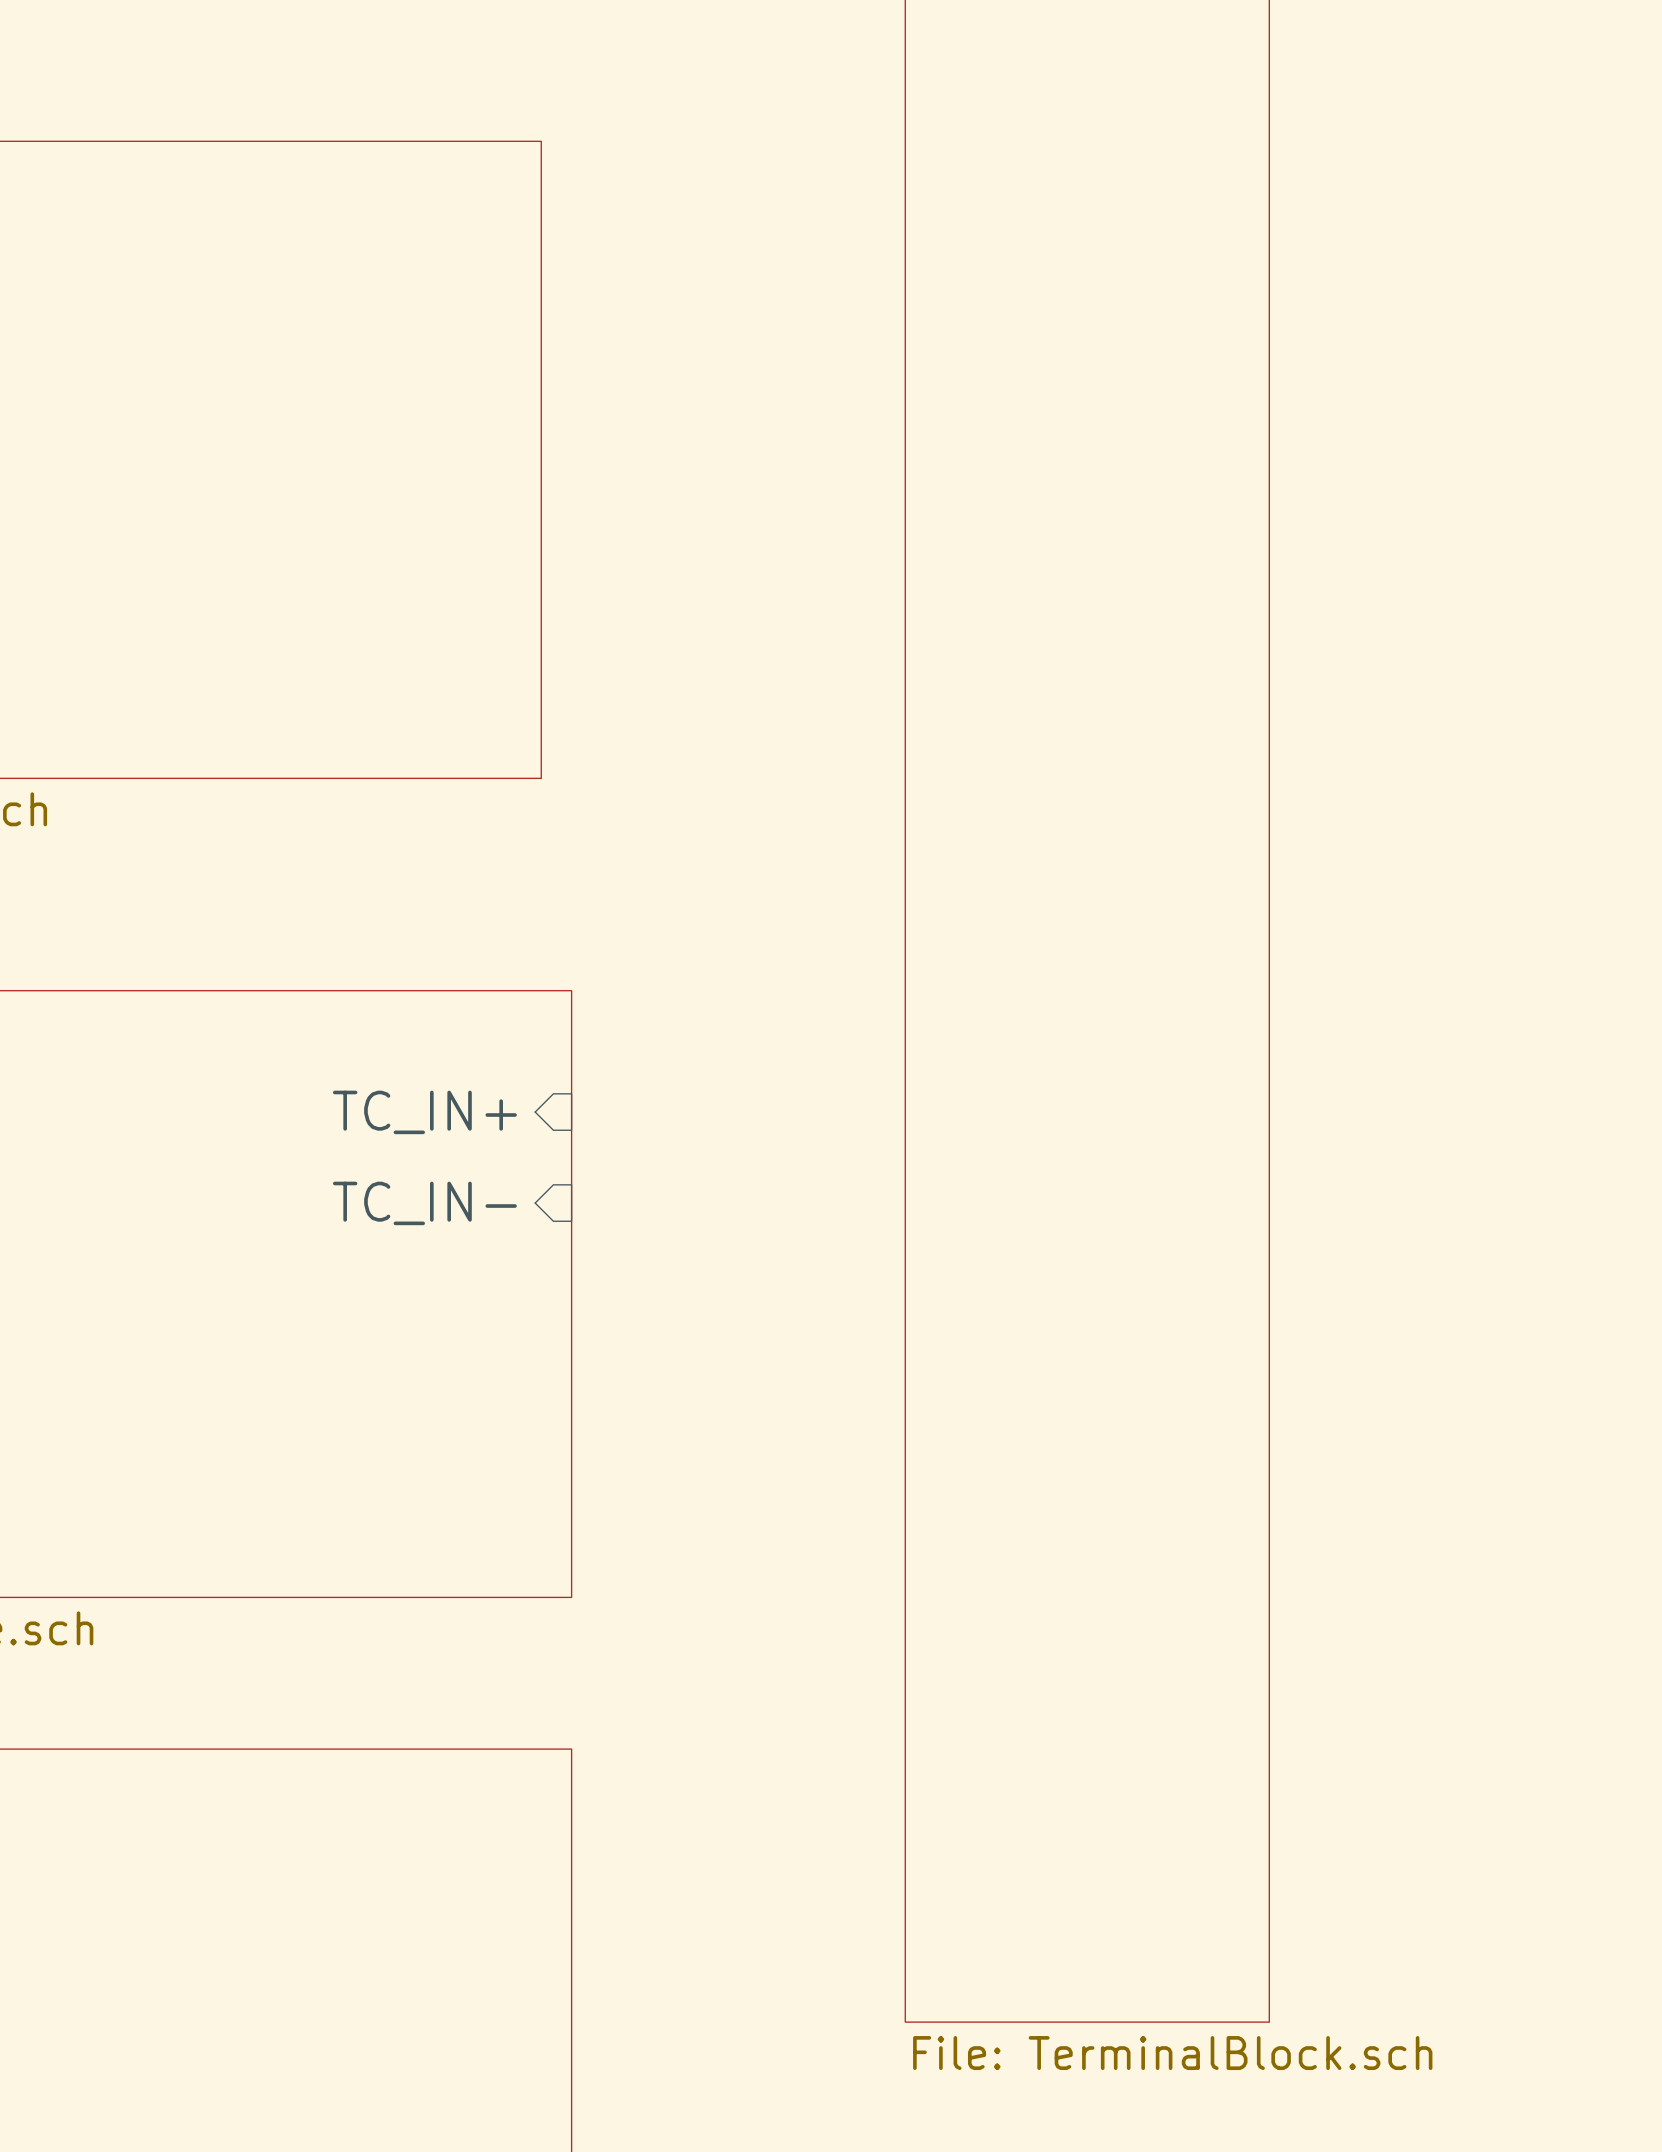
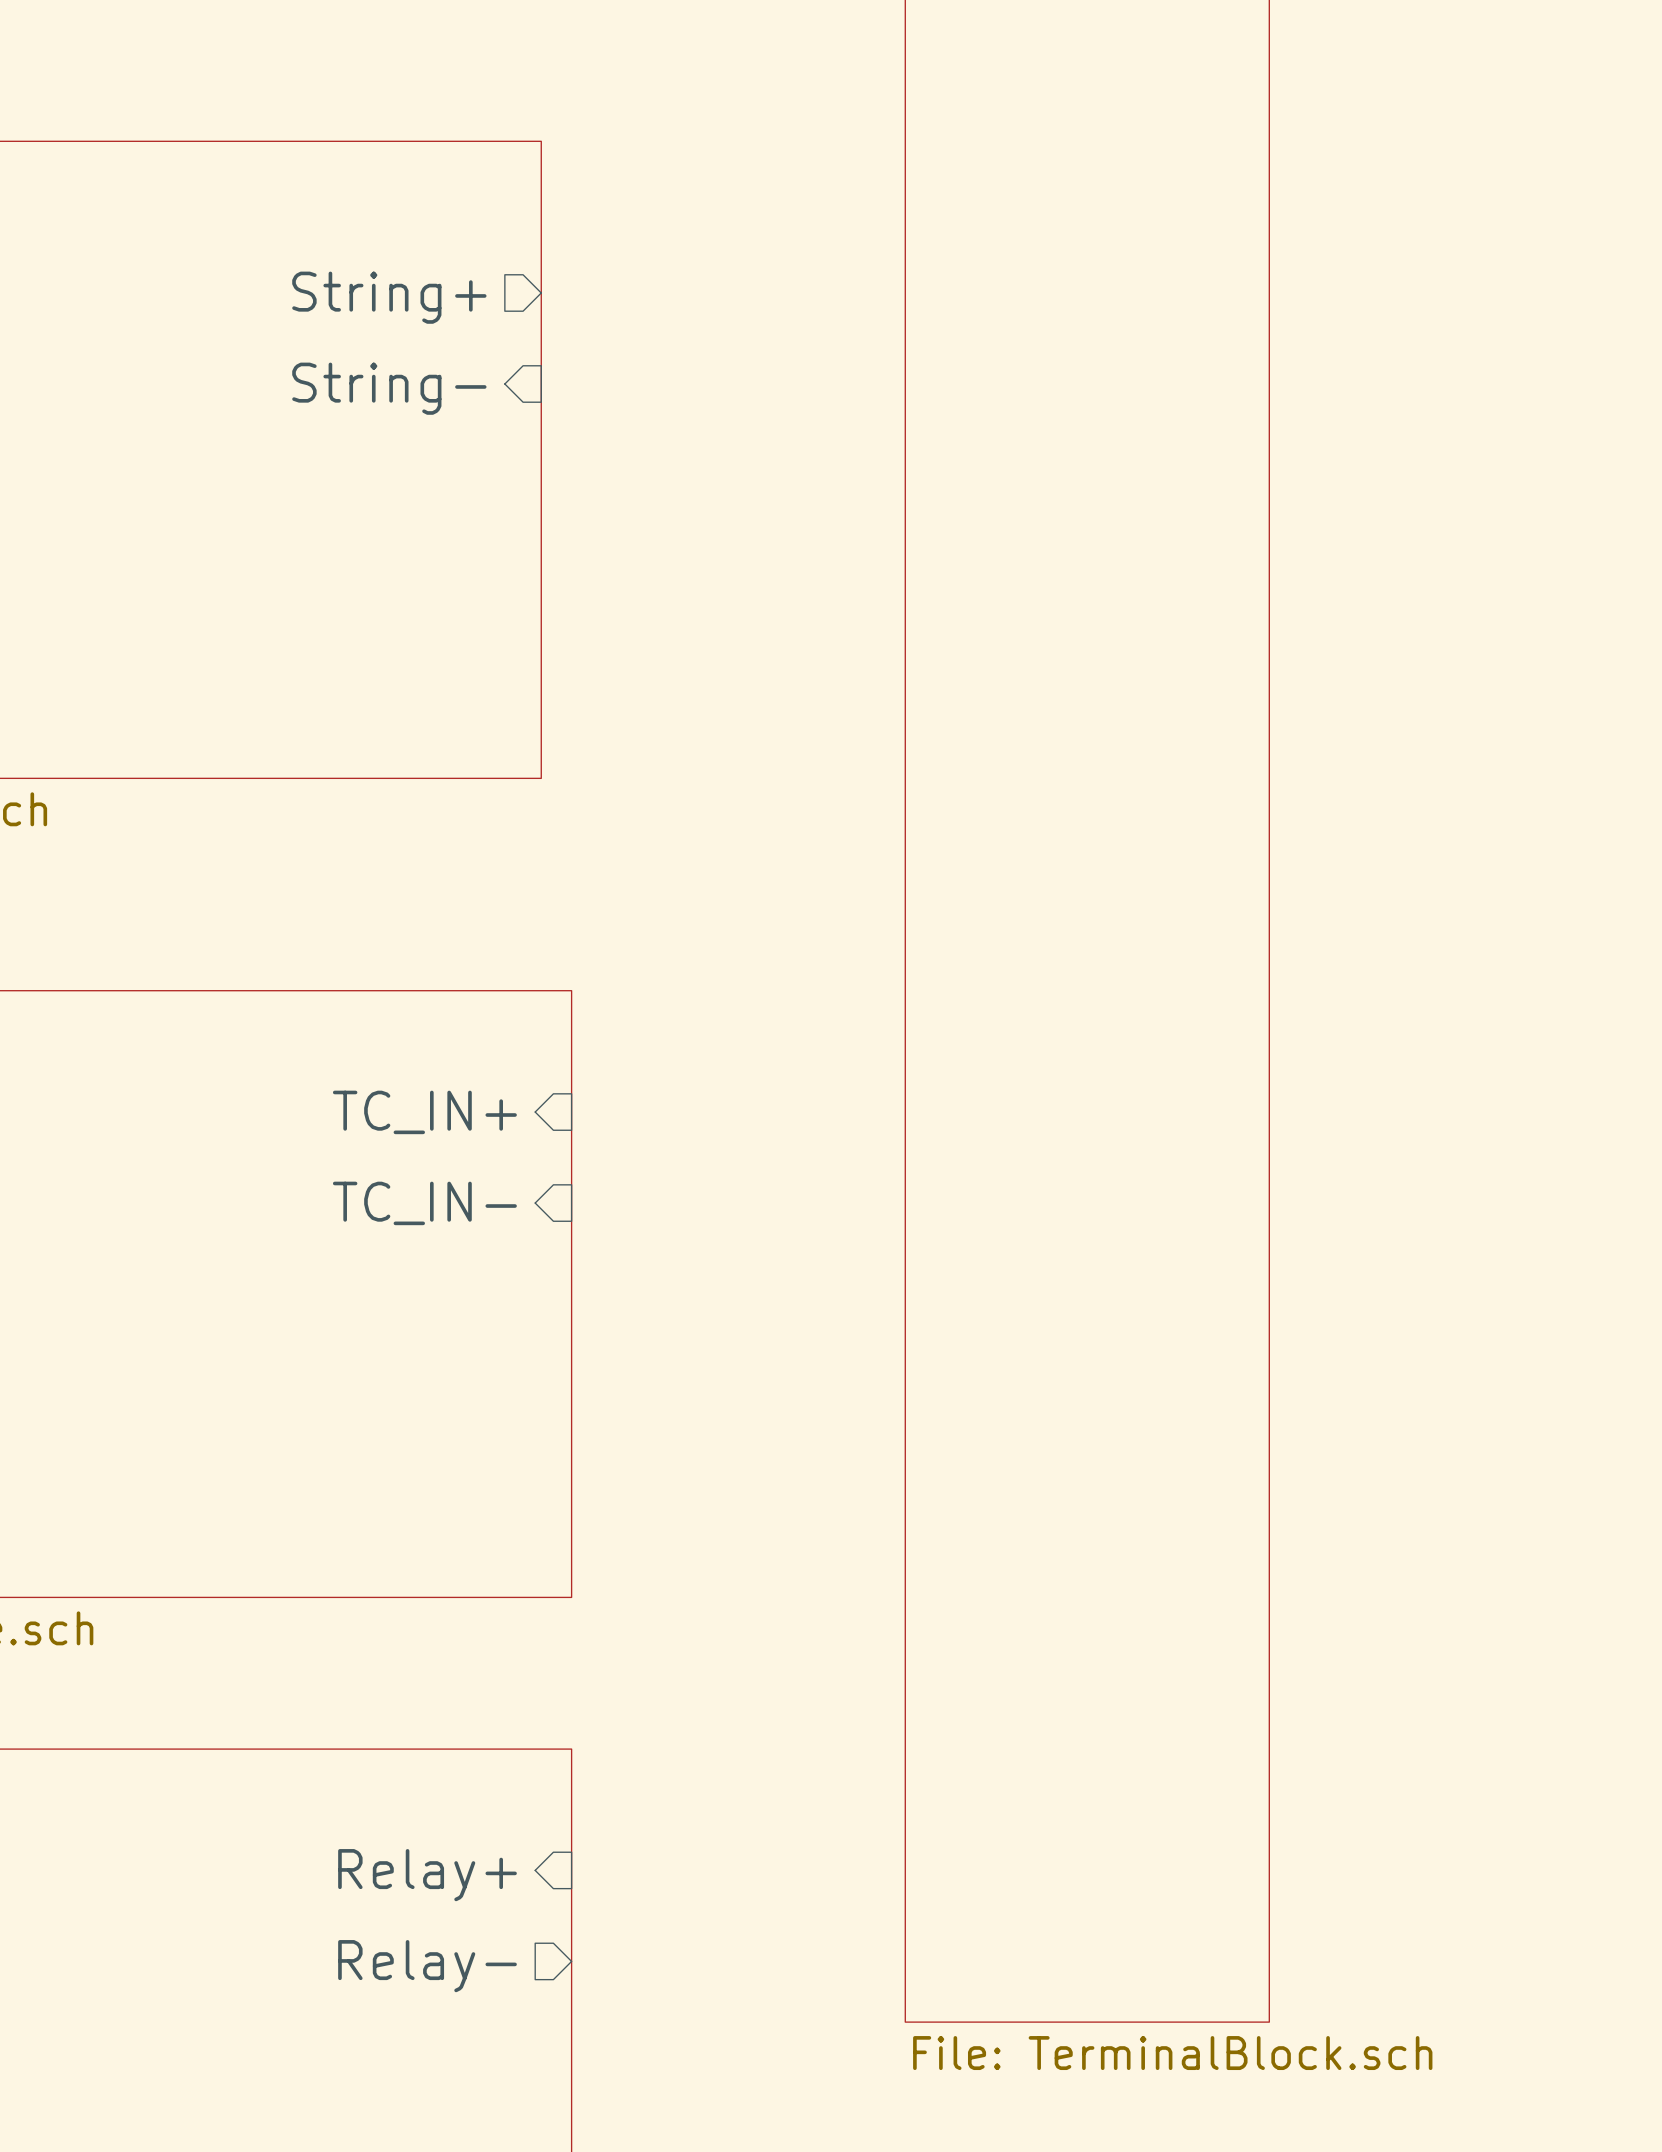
sheet pin: none -> String+ (389, 297)
sheet pin: none -> String- (389, 388)
sheet pin: none -> Relay+ (427, 1875)
sheet pin: none -> Relay- (427, 1966)

